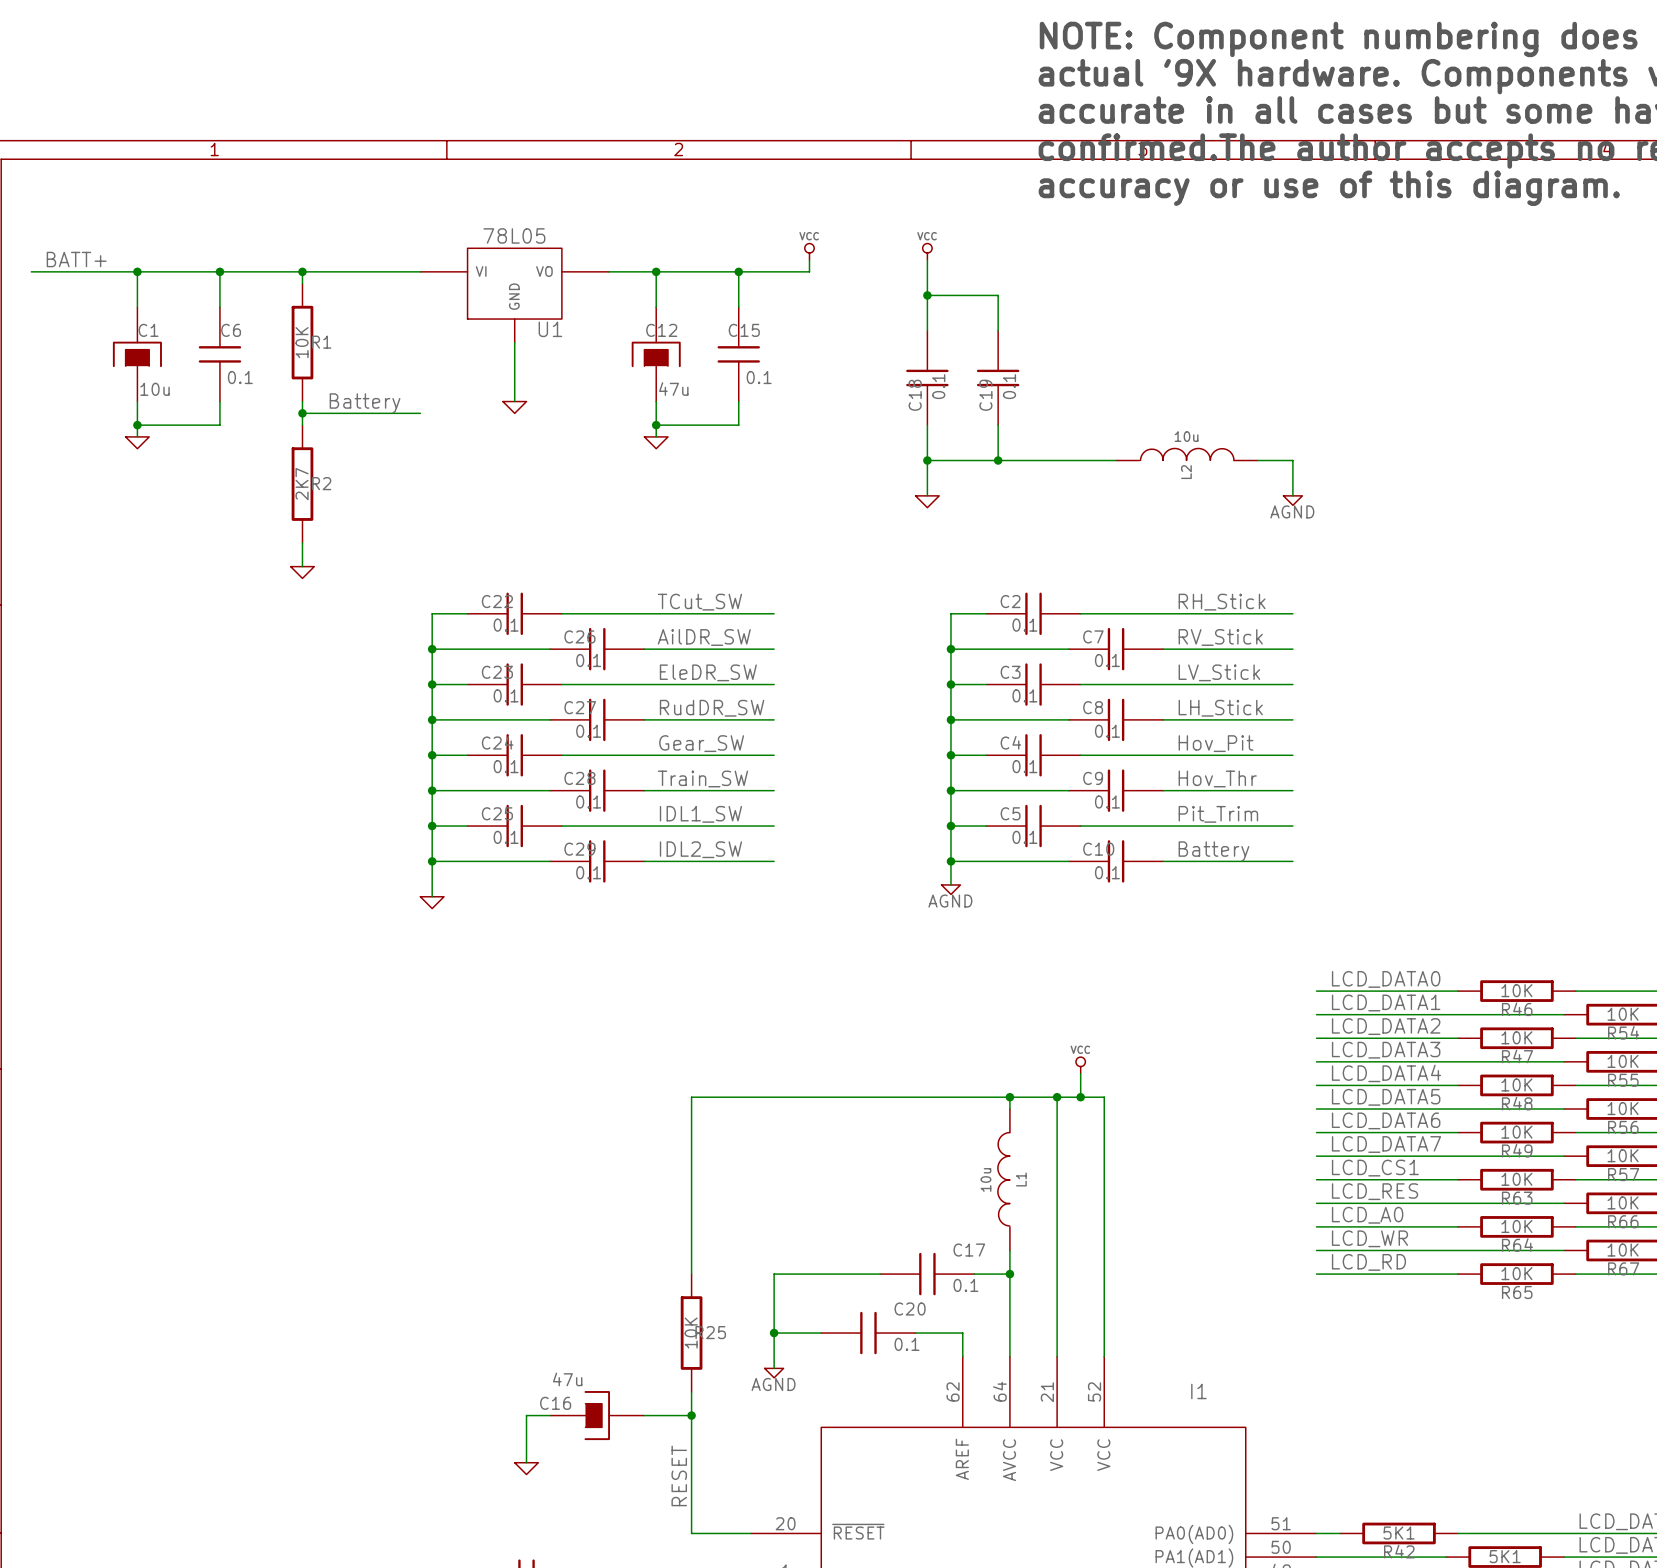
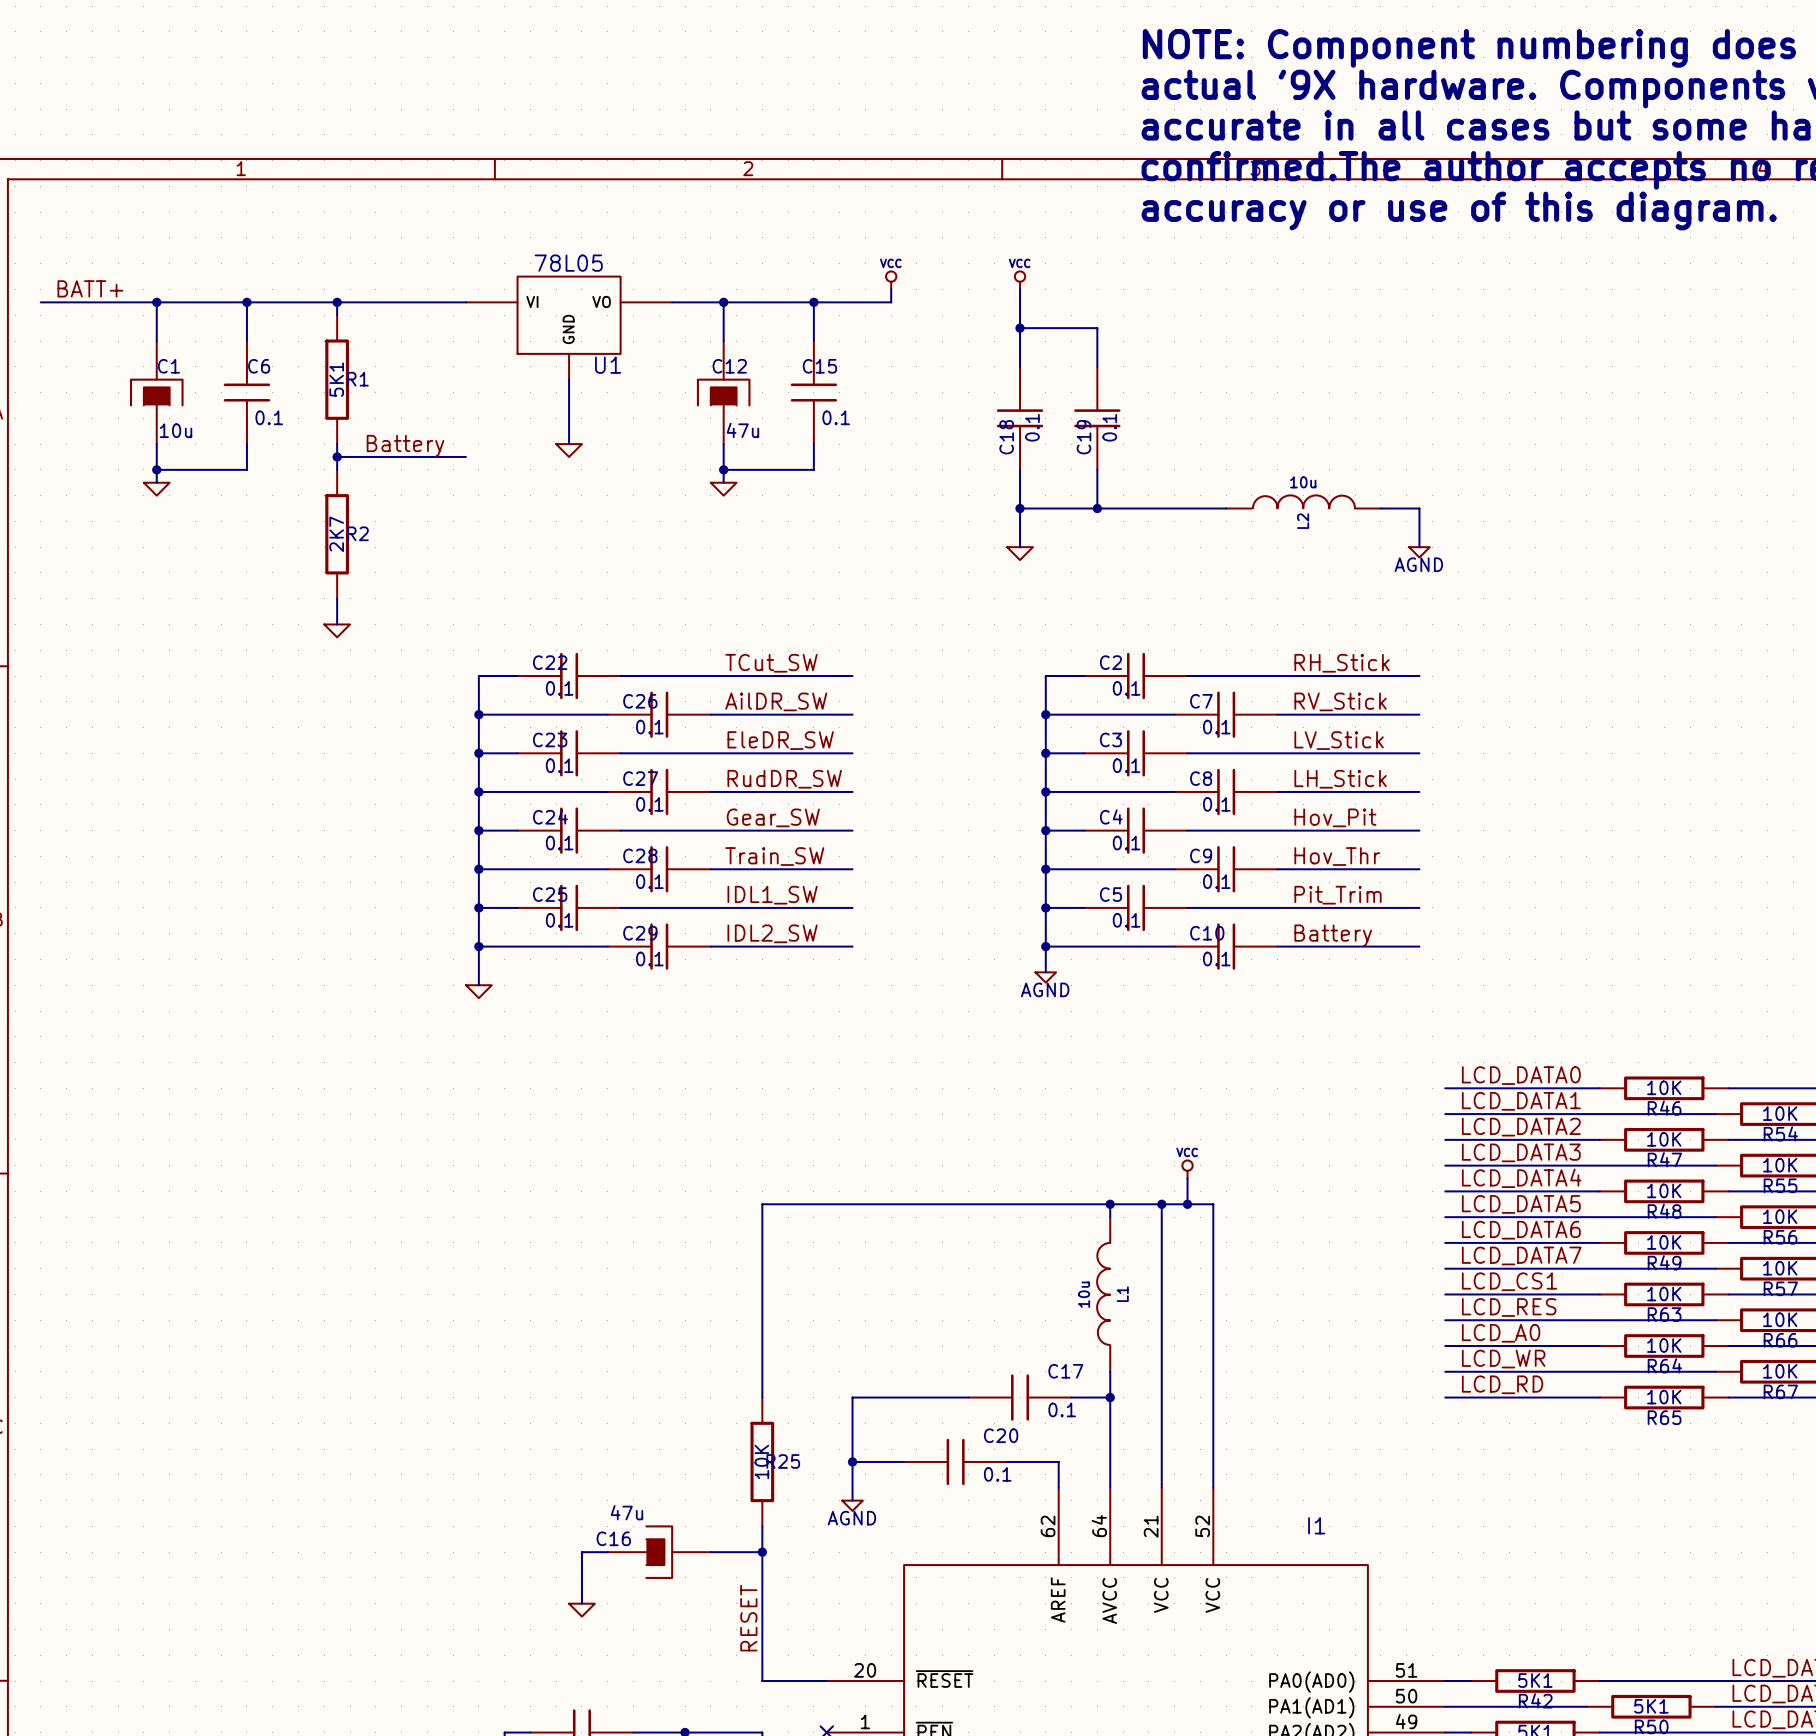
R1 value: 10K (302, 342) -> 5K1 (336, 379)

